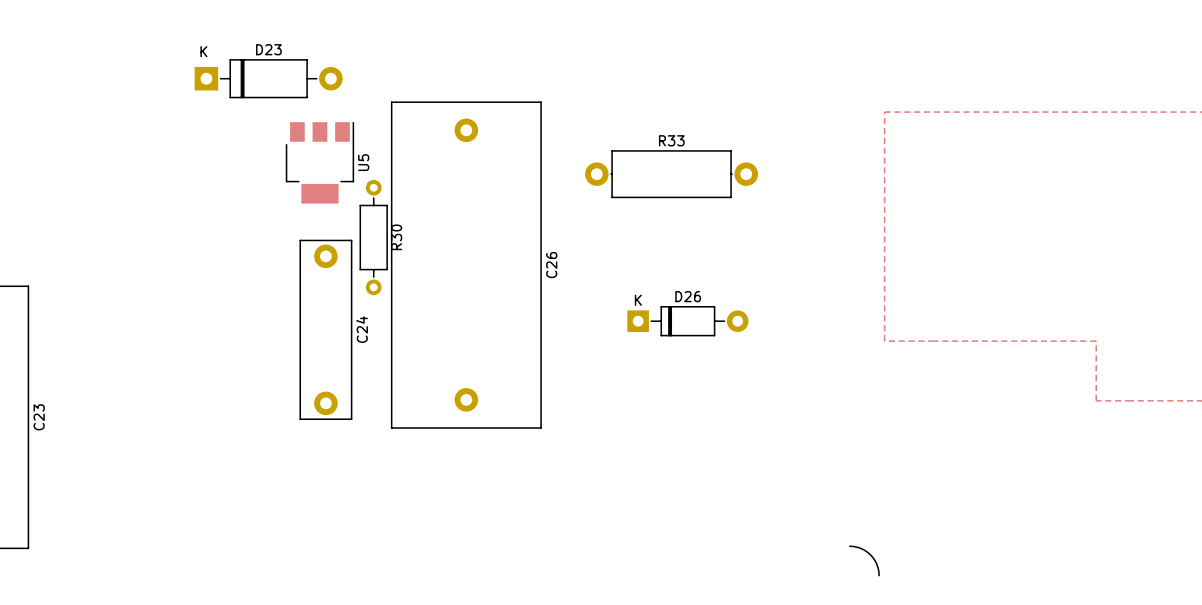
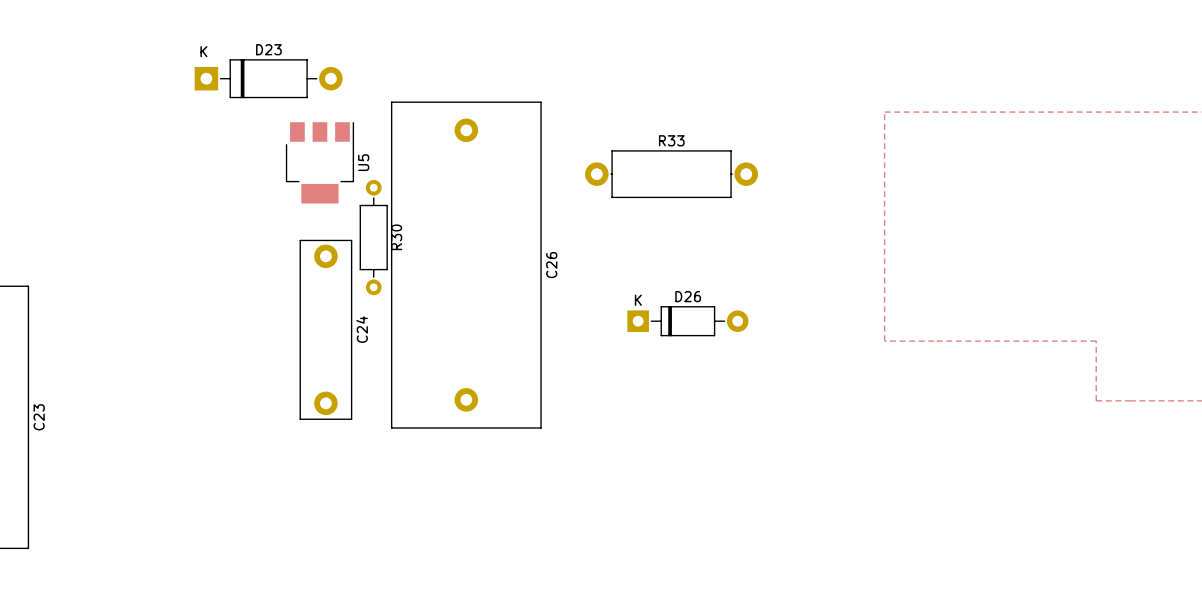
board edge: (849, 546) (861, 548) (870, 554) (876, 564) (879, 575) -> none

